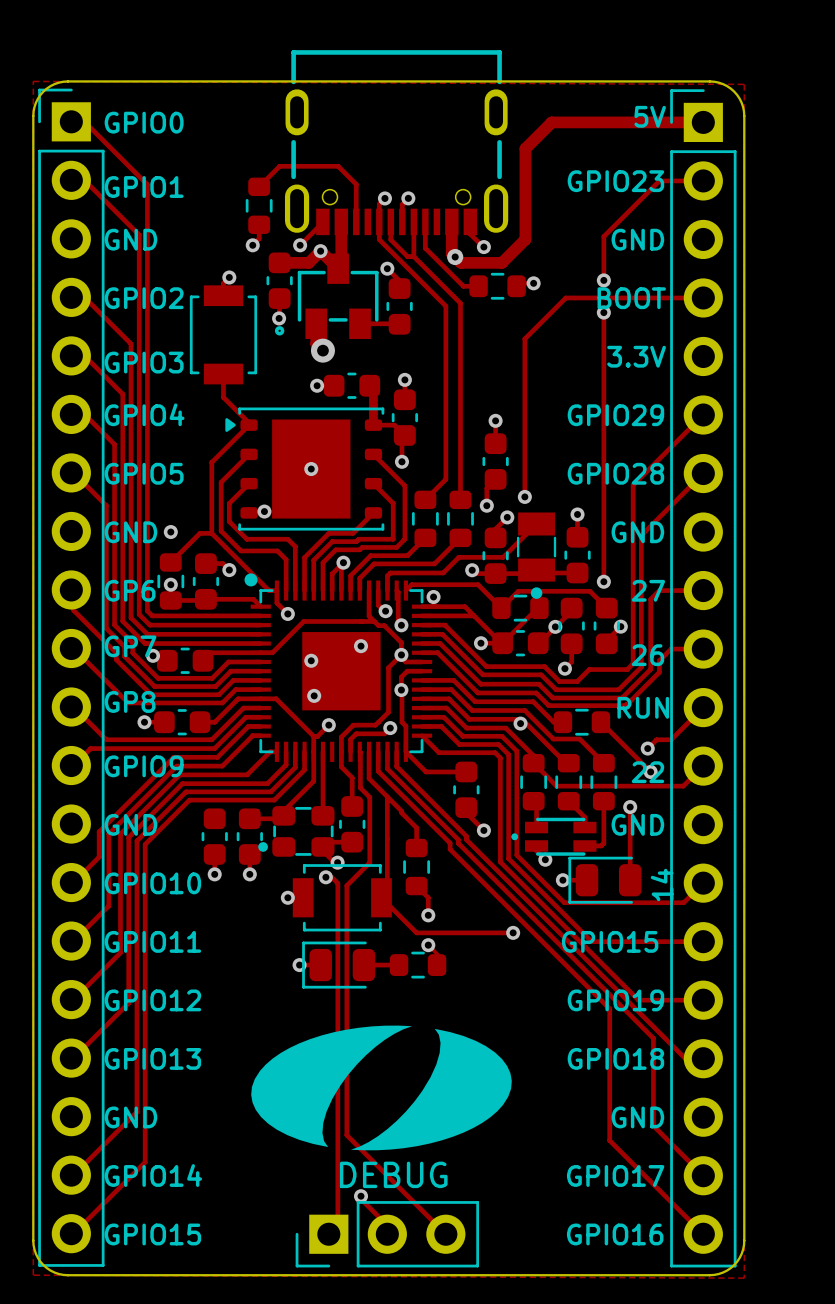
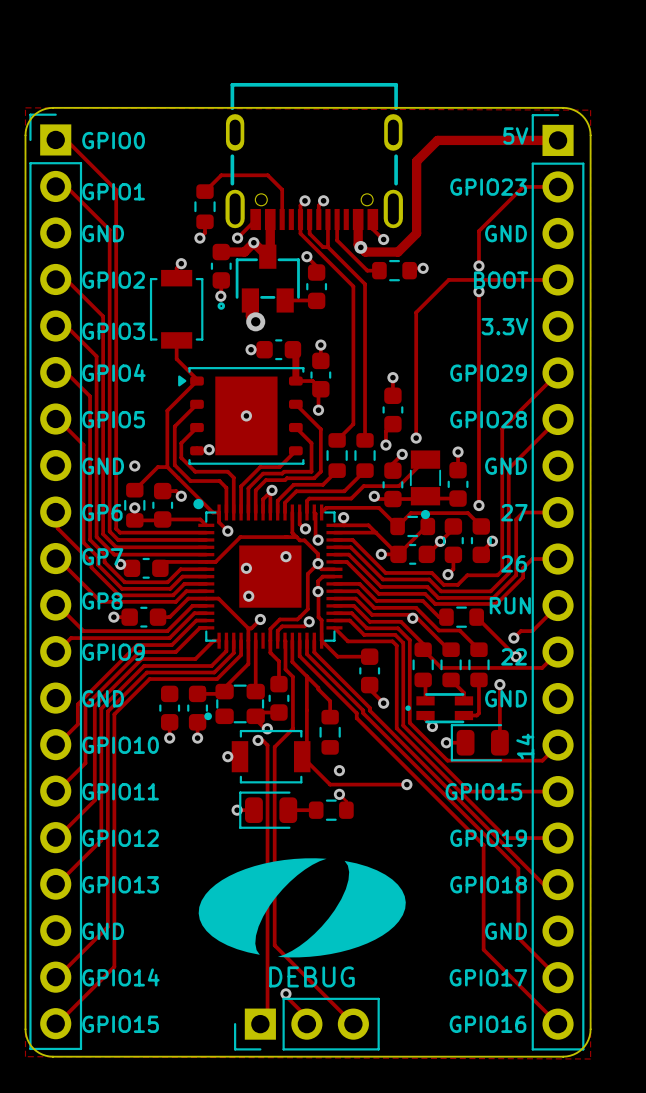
track: (416, 886) (428, 897) (428, 915) -> none

